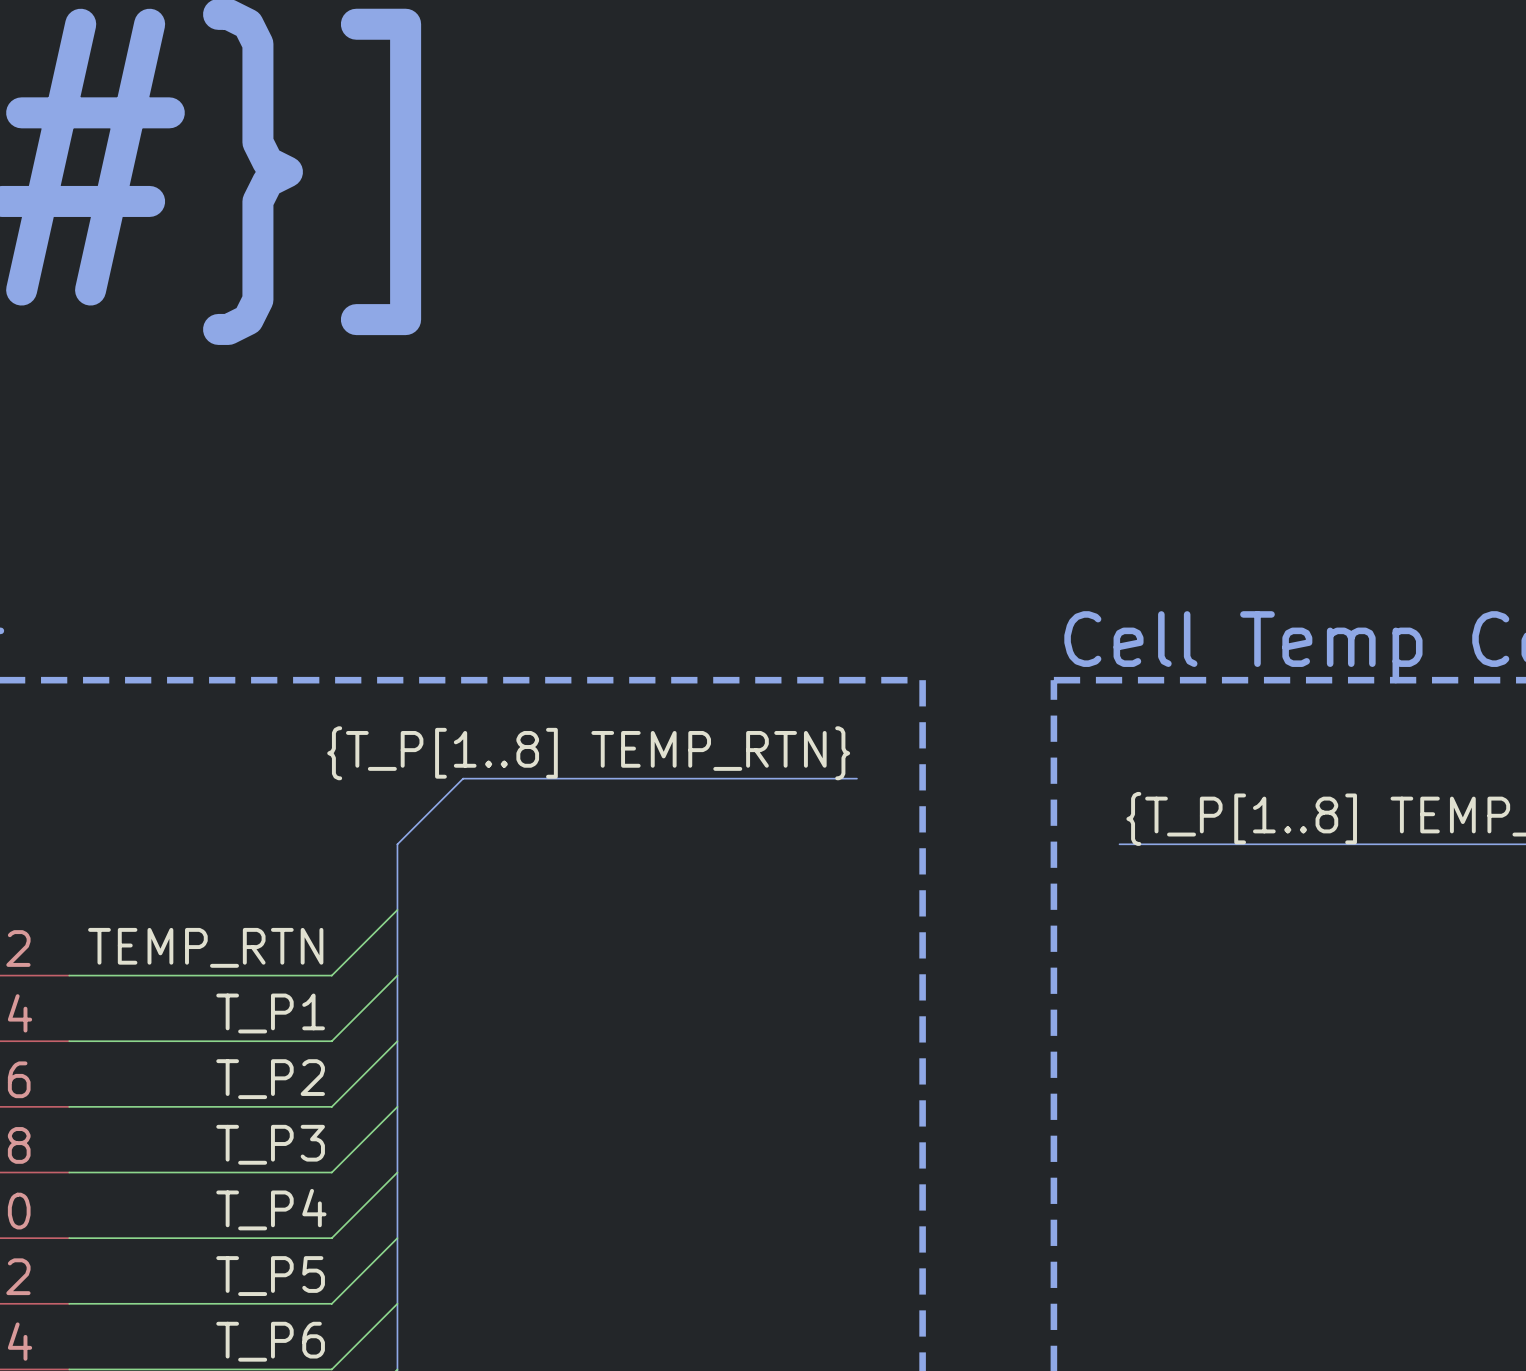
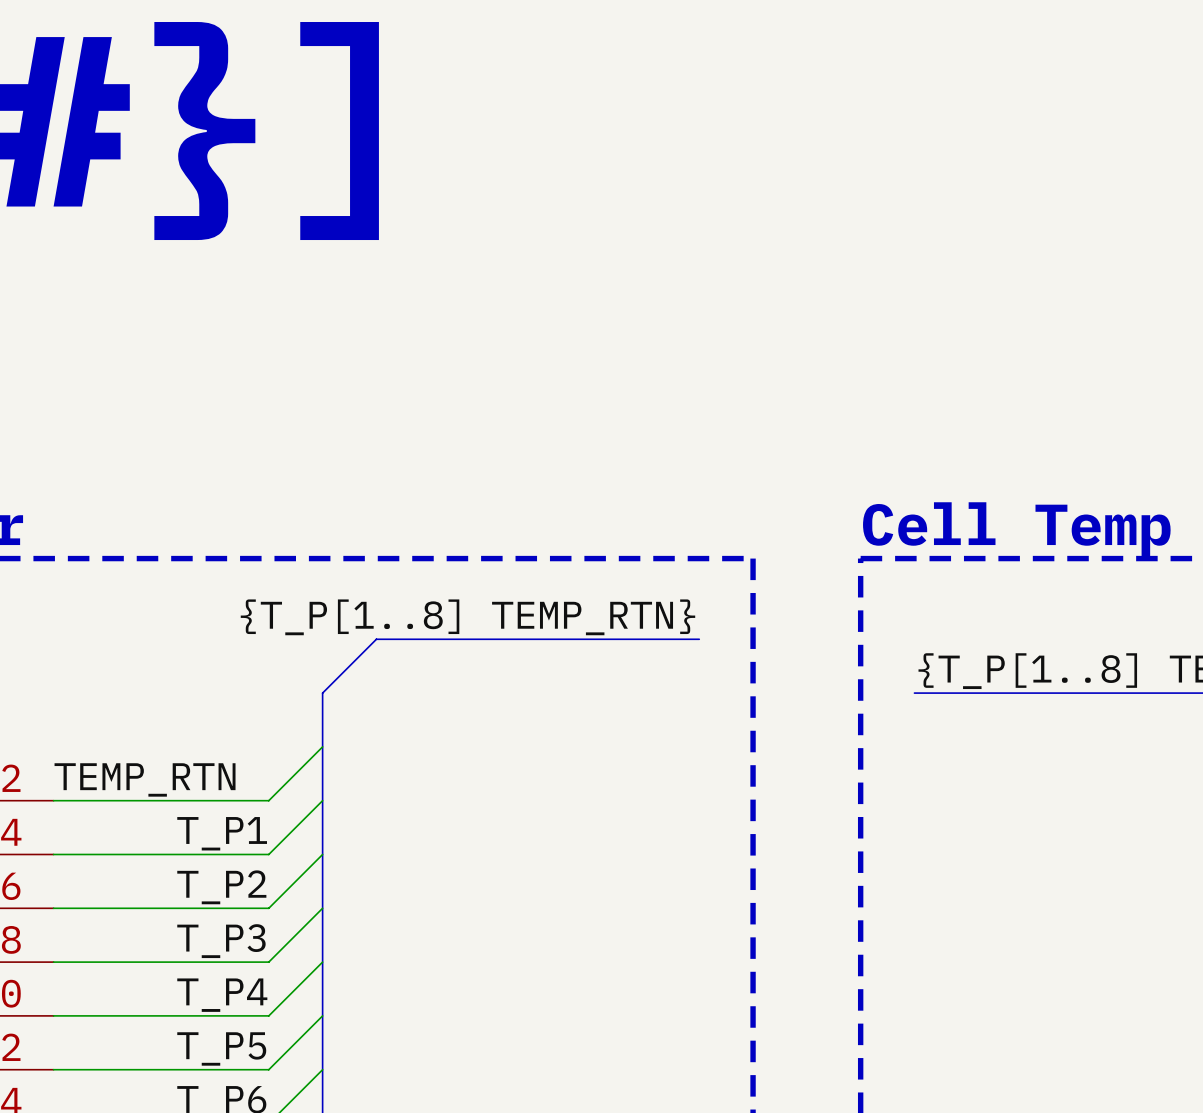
label position: TEMP_RTN (205, 947) -> TEMP_RTN (145, 779)

